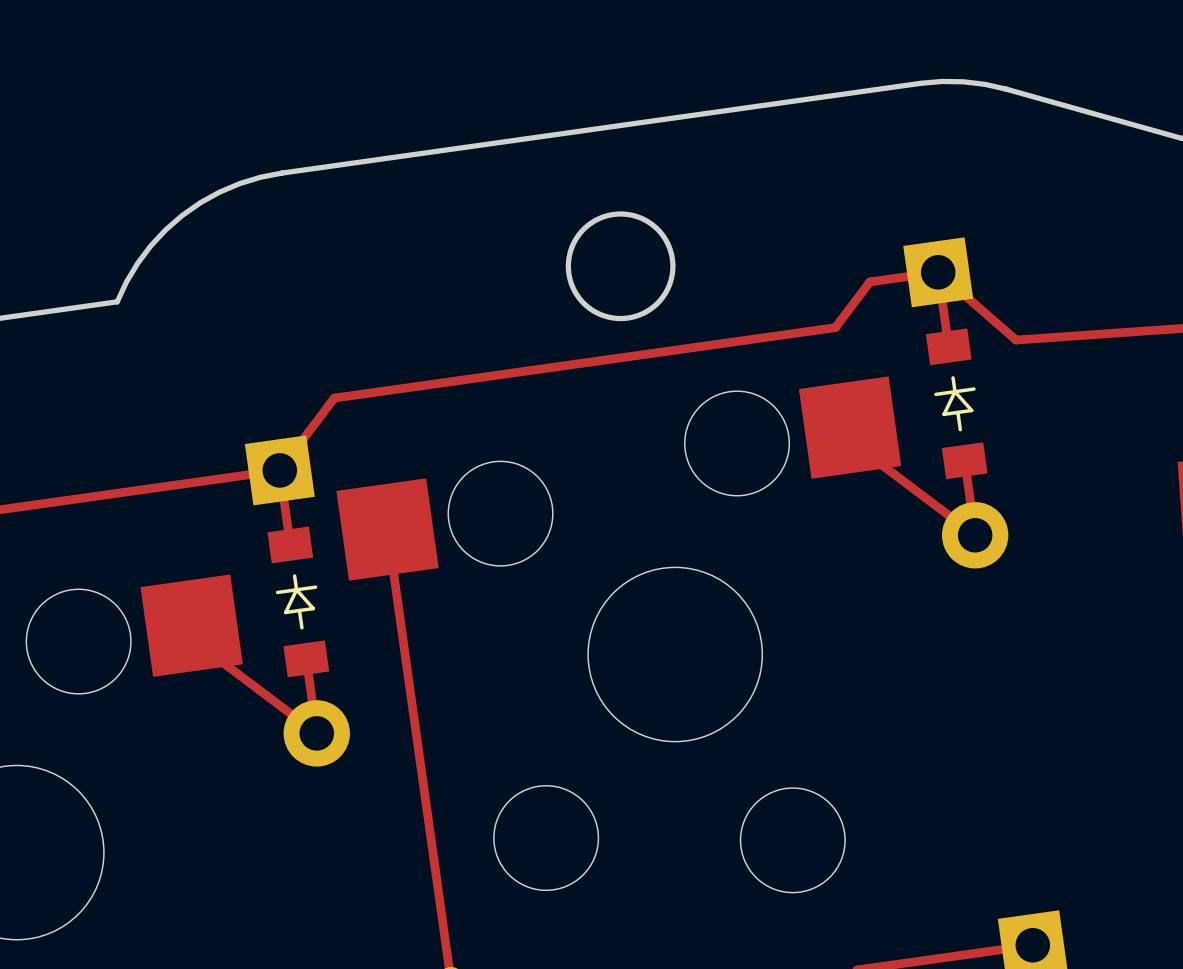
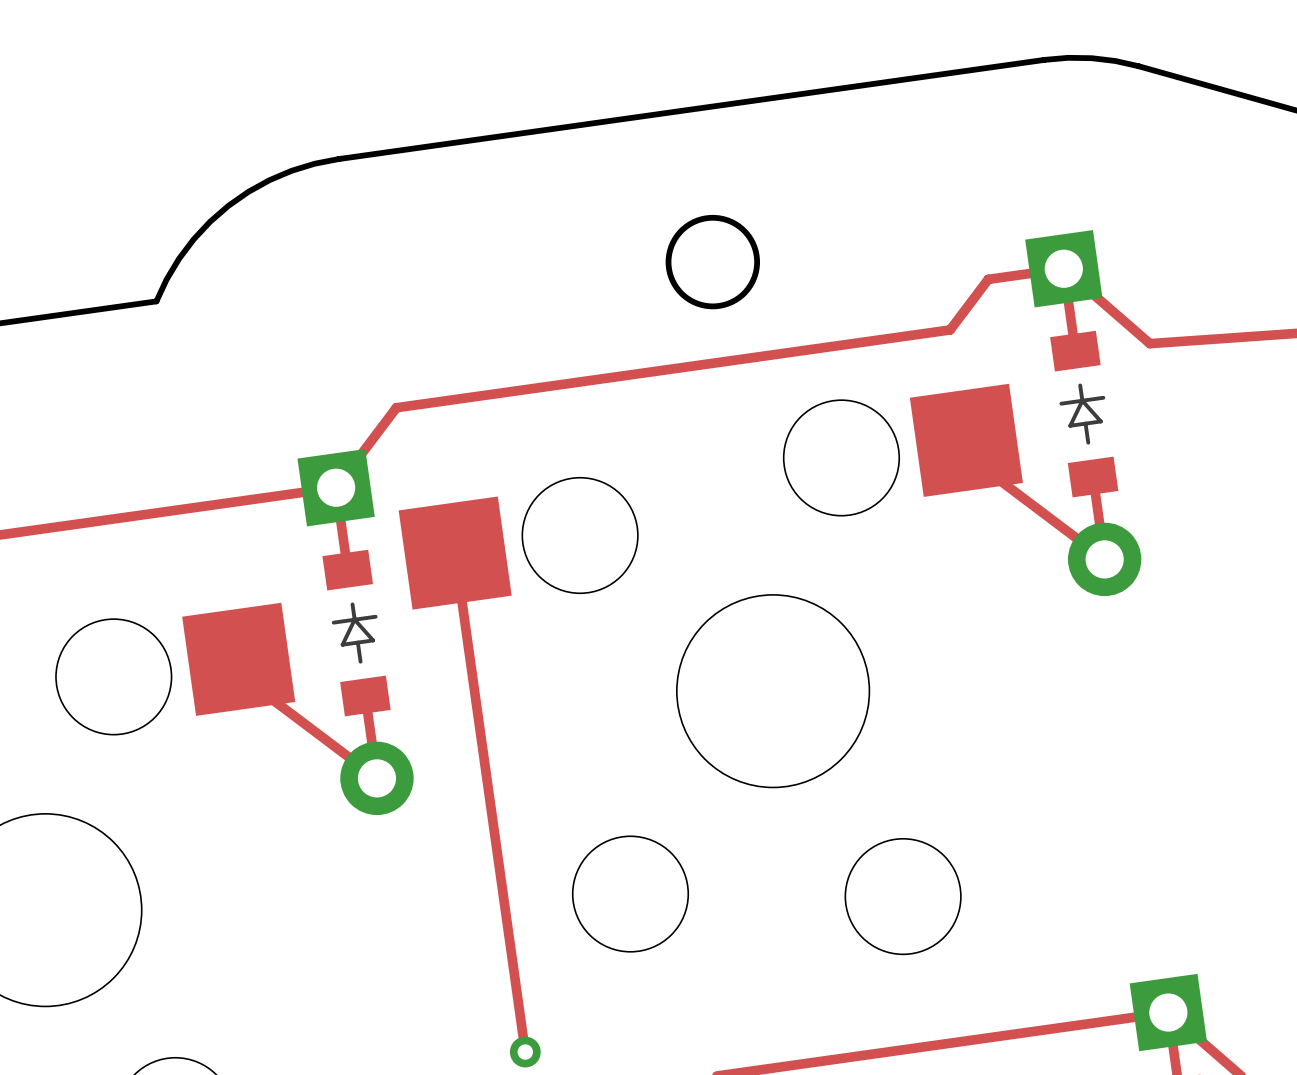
round board edge size: [565, 211, 676, 322] -> [665, 214, 761, 310]

